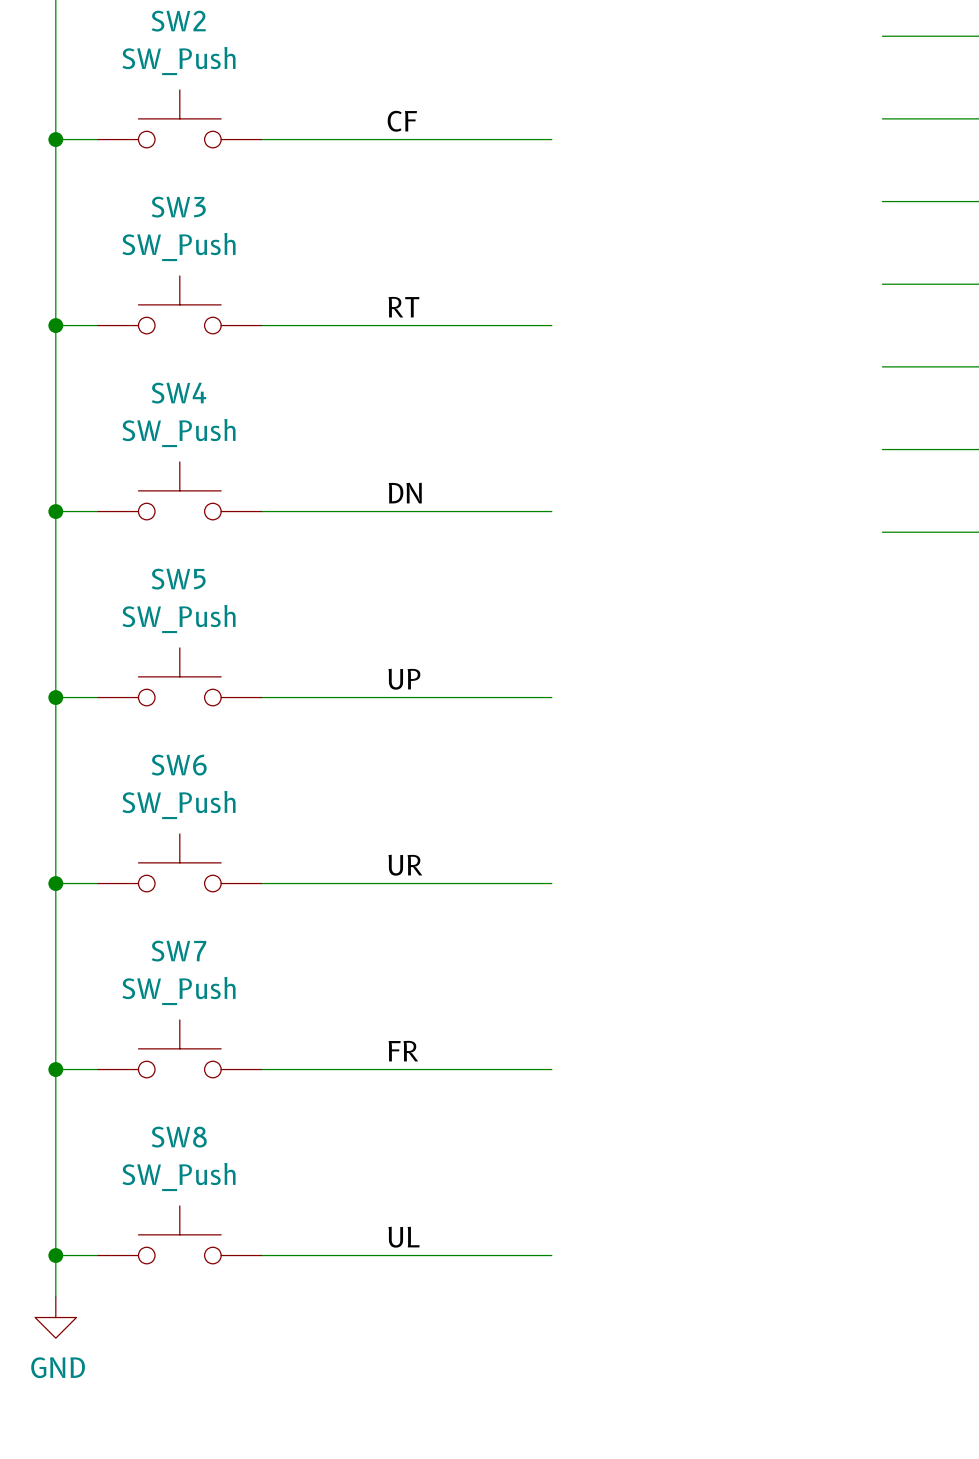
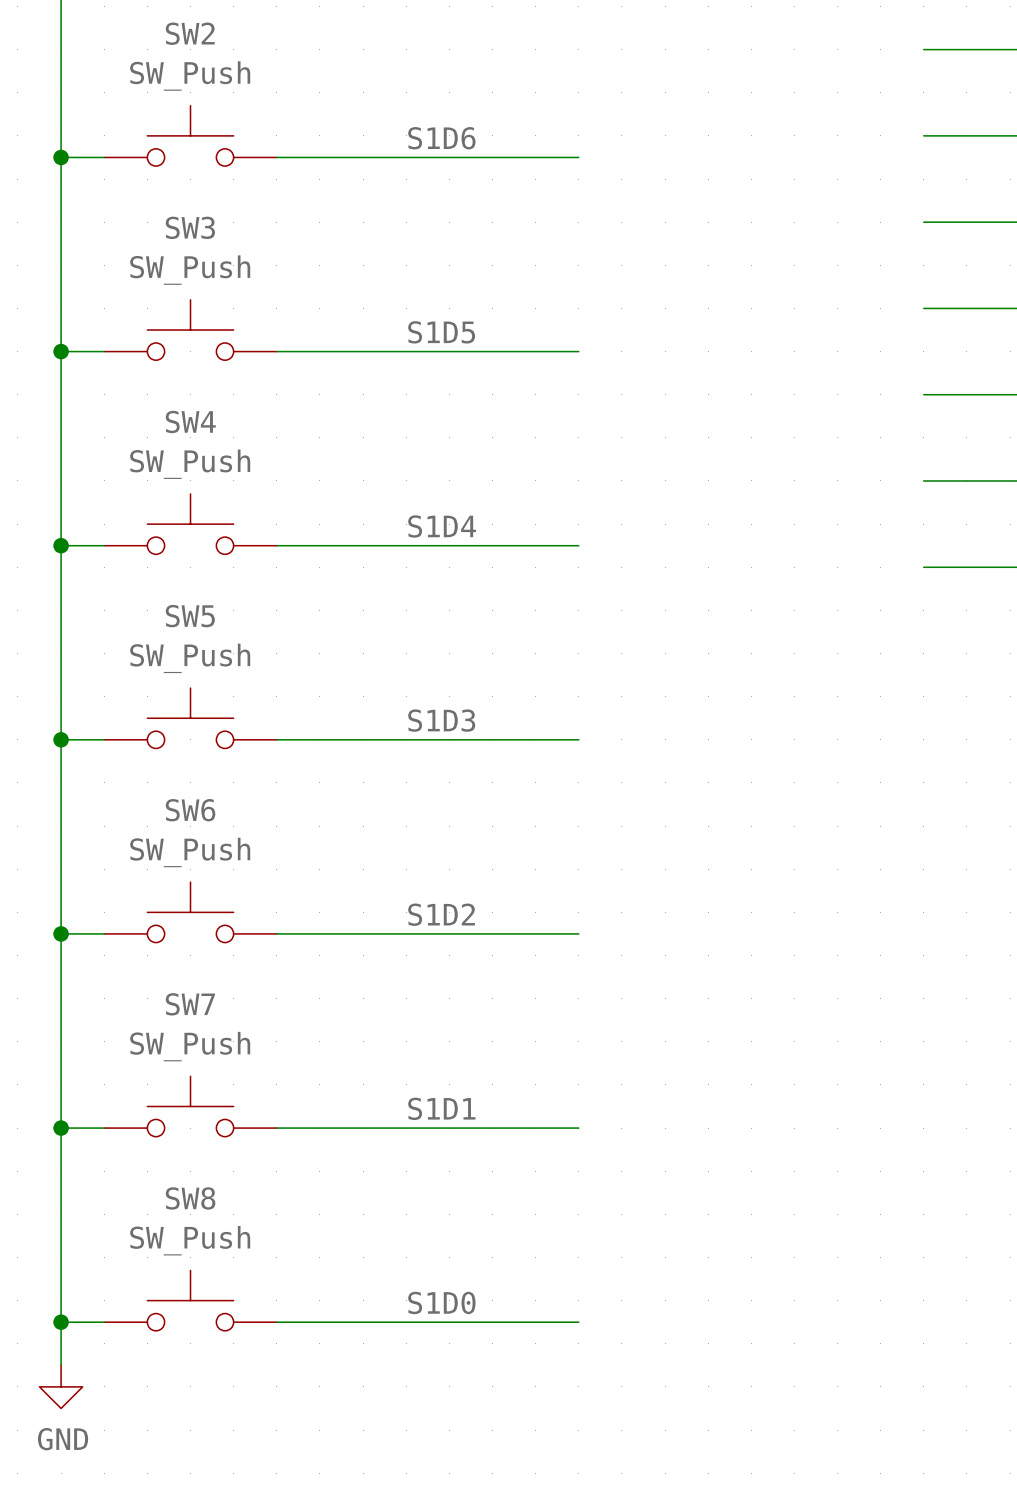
label: CF (402, 121) -> S1D6 (441, 138)
label: RT (403, 307) -> S1D5 (441, 332)
label: DN (405, 493) -> S1D4 (442, 526)
label: UP (404, 679) -> S1D3 (441, 720)
label: UR (405, 865) -> S1D2 (441, 914)
label: FR (403, 1051) -> S1D1 (441, 1108)
label: UL (404, 1237) -> S1D0 (441, 1302)

